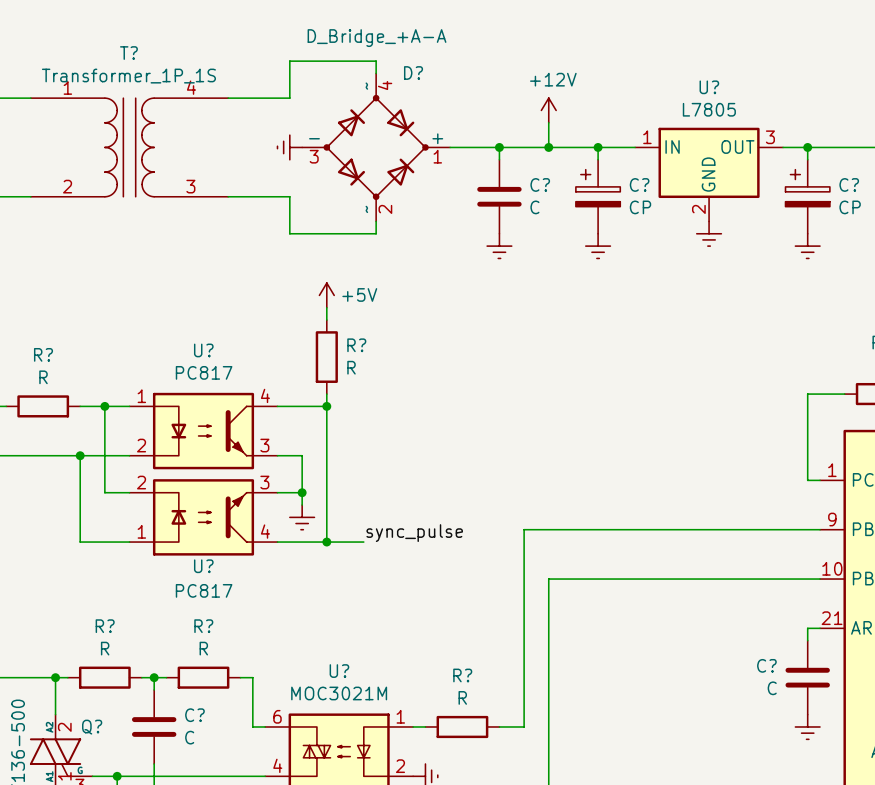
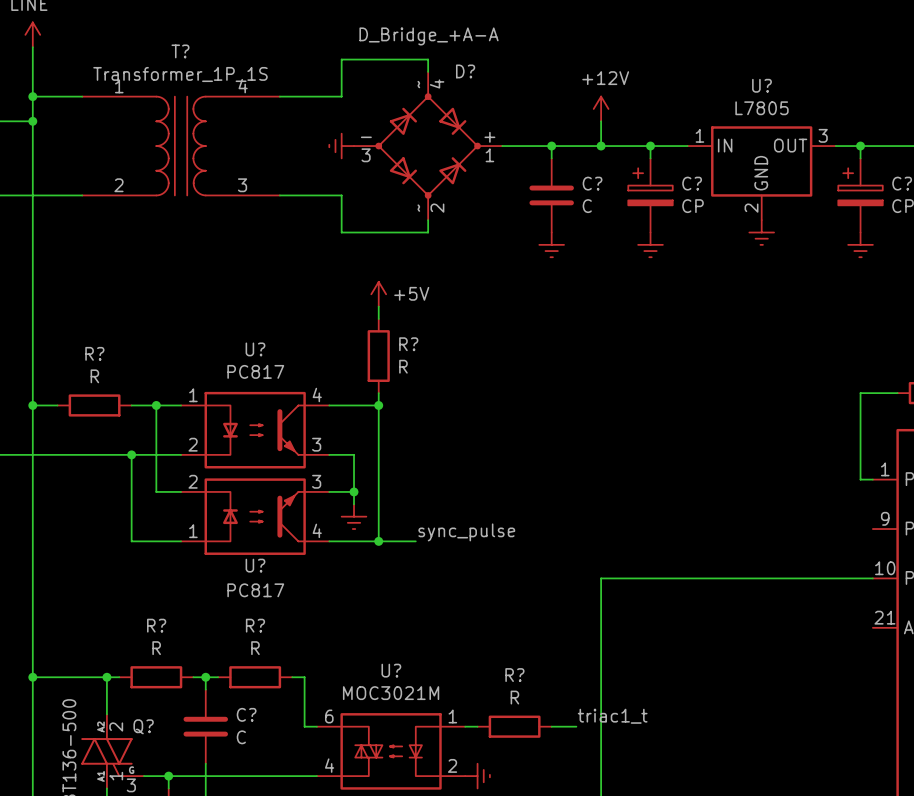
wire: (820, 529) (524, 529) (524, 726) -> none
wire: (820, 628) (807, 628) (807, 640) -> none
C?: C (807, 677) -> none
label: none -> triac1_t (612, 716)
power symbol: (807, 726) -> none

